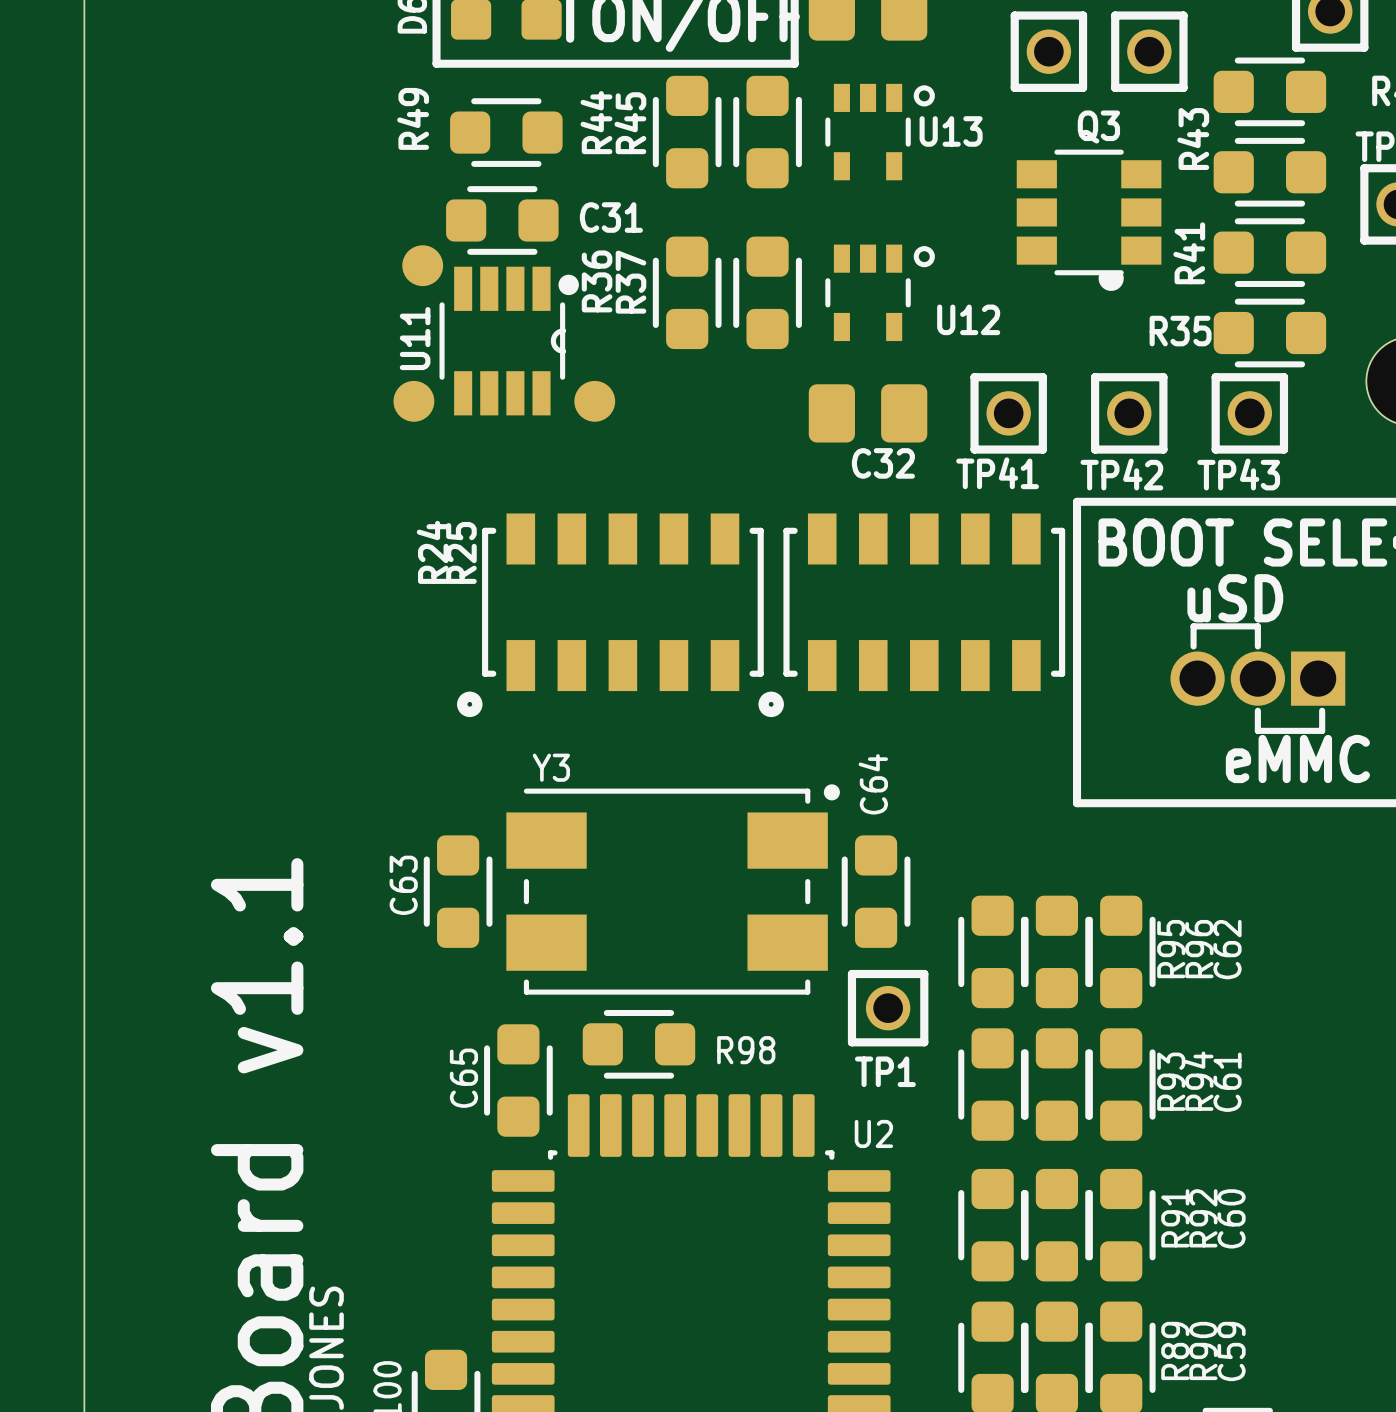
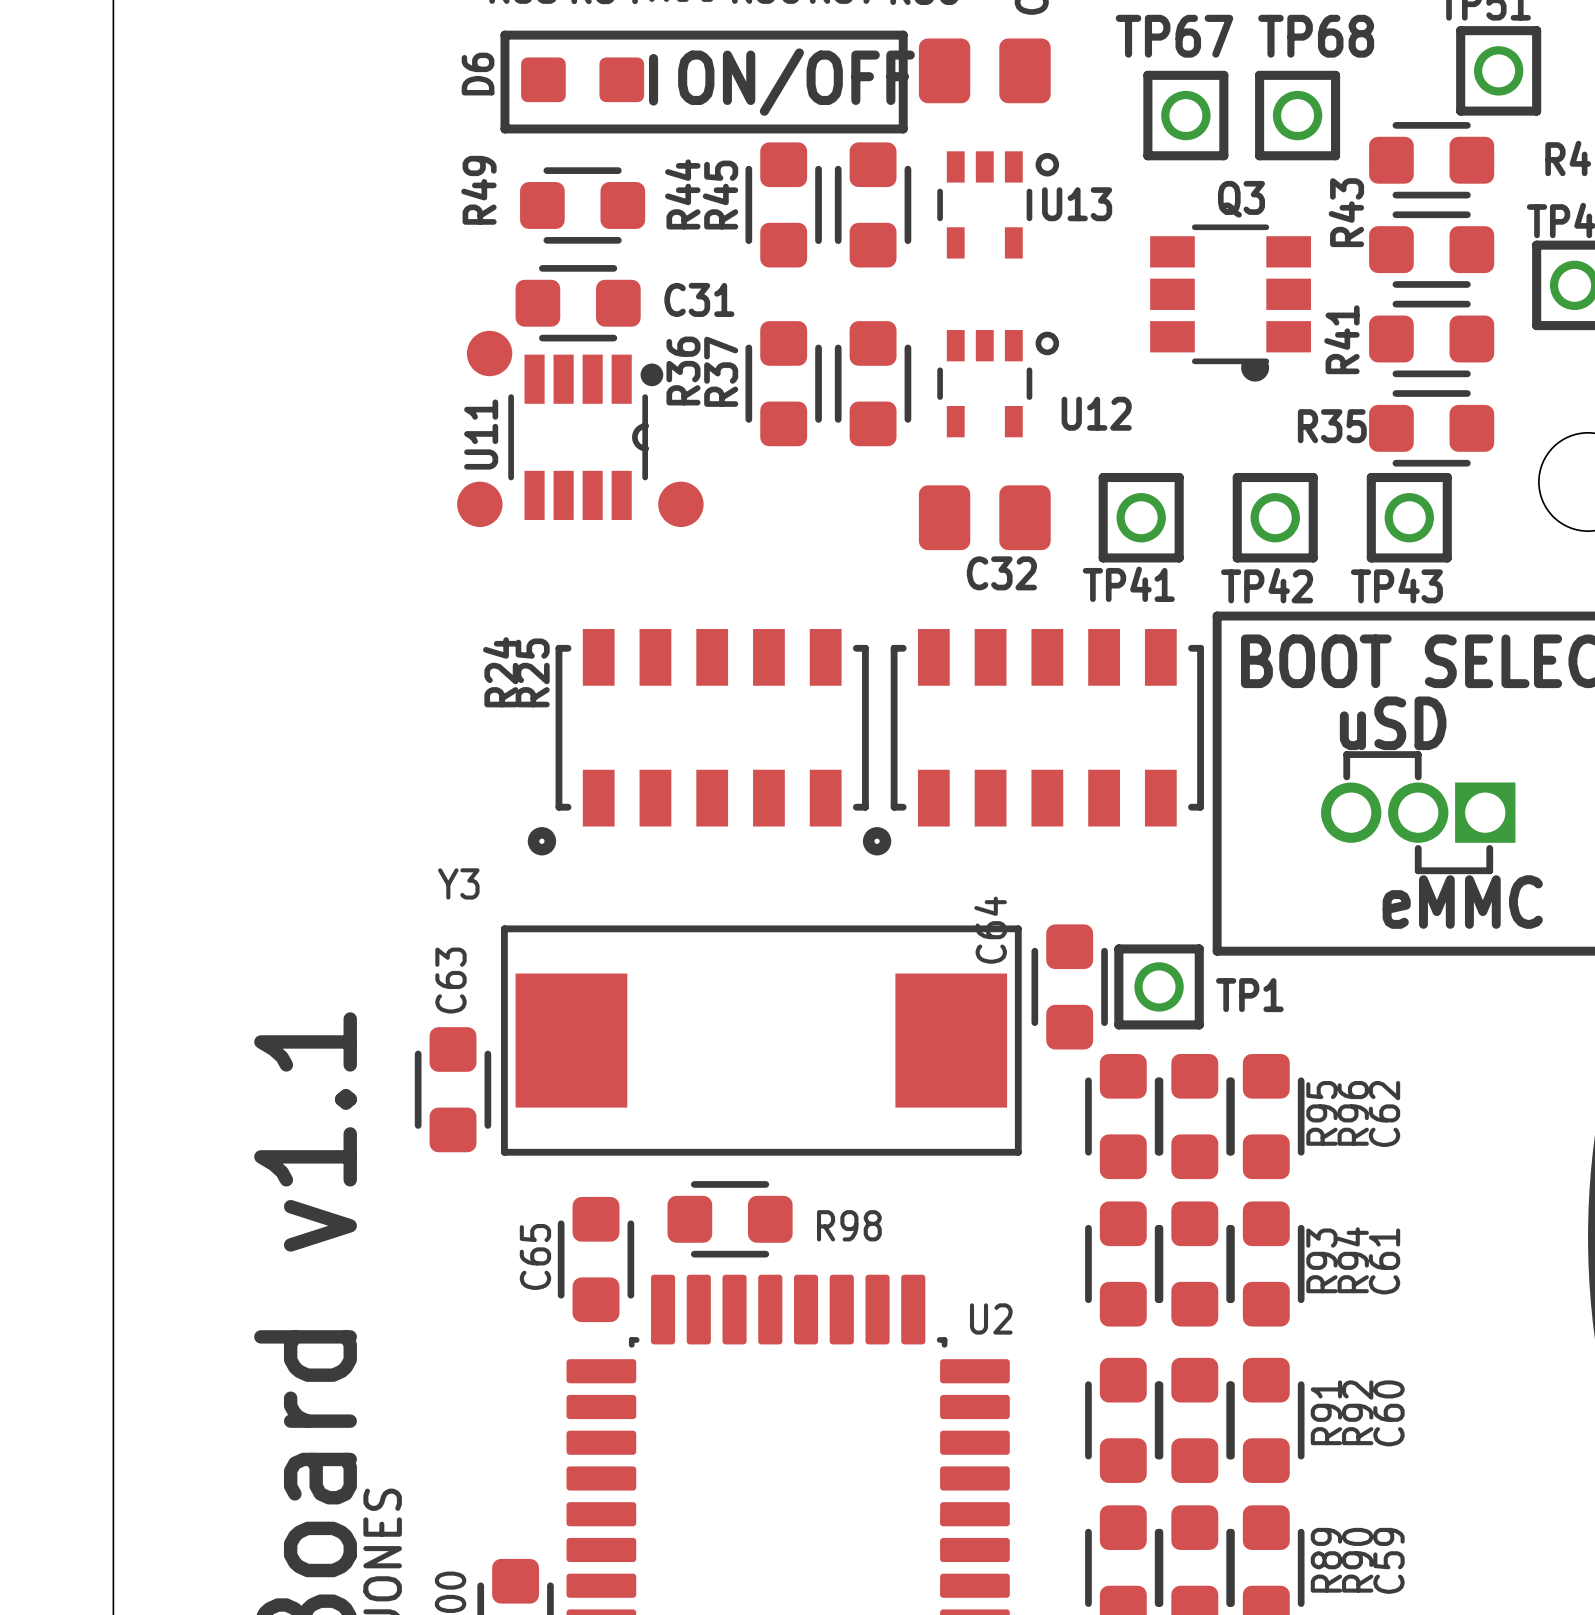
Y3 name position: Y3 (551, 767) -> Y3 (458, 883)
Y3 footprint: [506, 784, 840, 995] -> [500, 925, 1022, 1156]
C63 name position: C63 (403, 885) -> C63 (450, 980)
C63 position: (458, 891) -> (453, 1089)
C64 position: (876, 891) -> (1069, 986)
TP1 position: (888, 1008) -> (1159, 986)
TP1 name position: TP1 (885, 1071) -> TP1 (1249, 995)

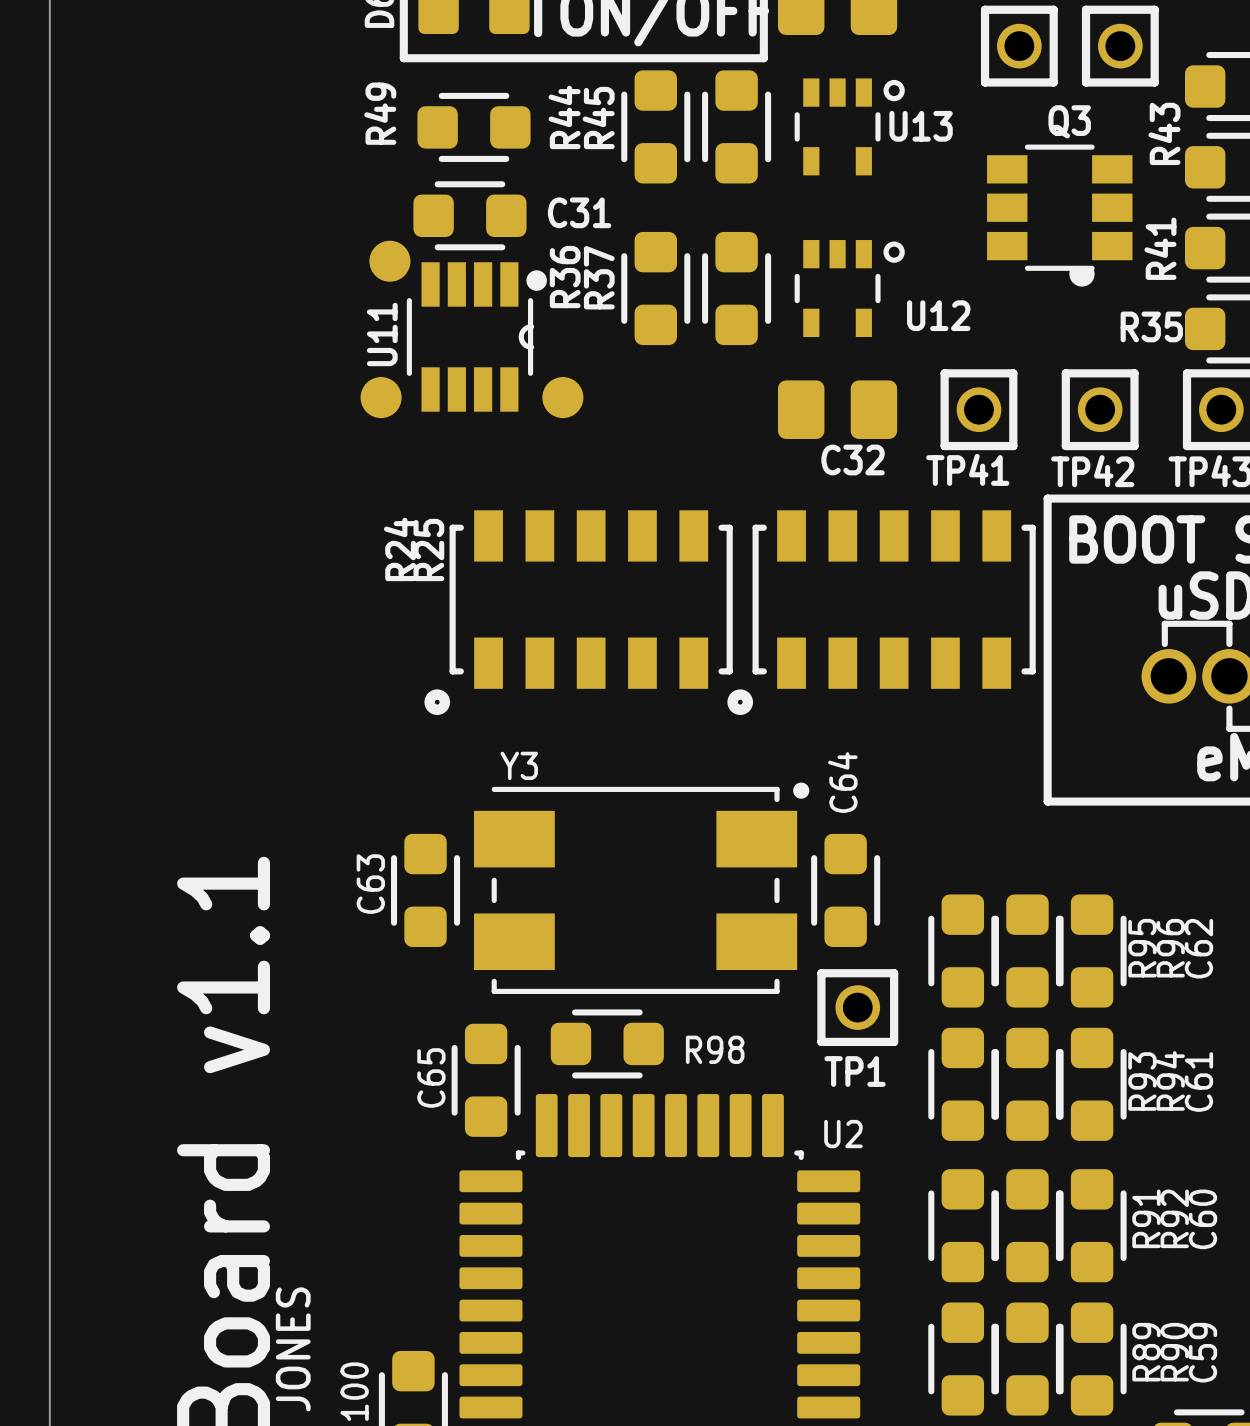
Y3 name position: Y3 (458, 883) -> Y3 (519, 765)
Y3 footprint: [500, 925, 1022, 1156] -> [474, 782, 810, 994]
C63 name position: C63 (450, 980) -> C63 (370, 884)
C64 position: (1069, 986) -> (845, 890)
TP1 position: (1159, 986) -> (857, 1007)
TP1 name position: TP1 (1249, 995) -> TP1 (855, 1071)
C63 position: (453, 1089) -> (425, 890)

